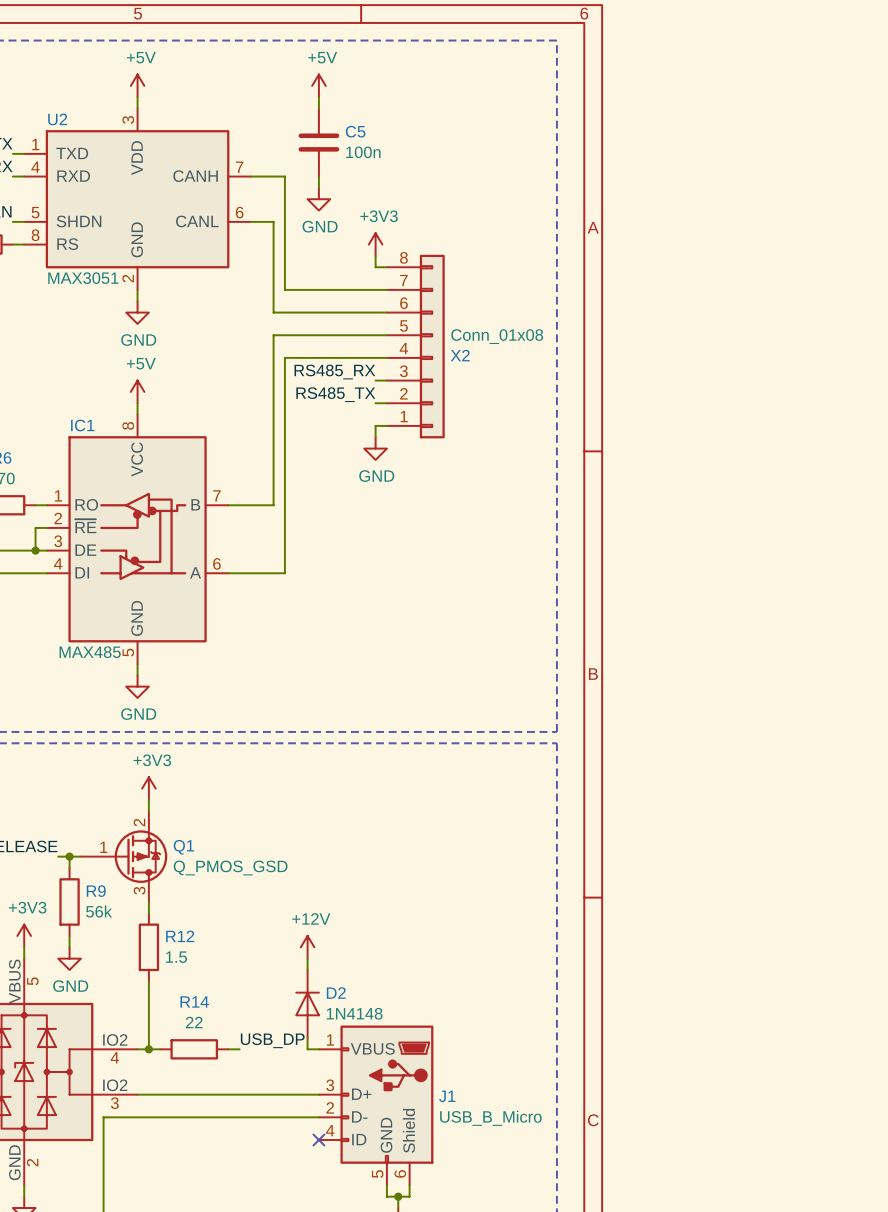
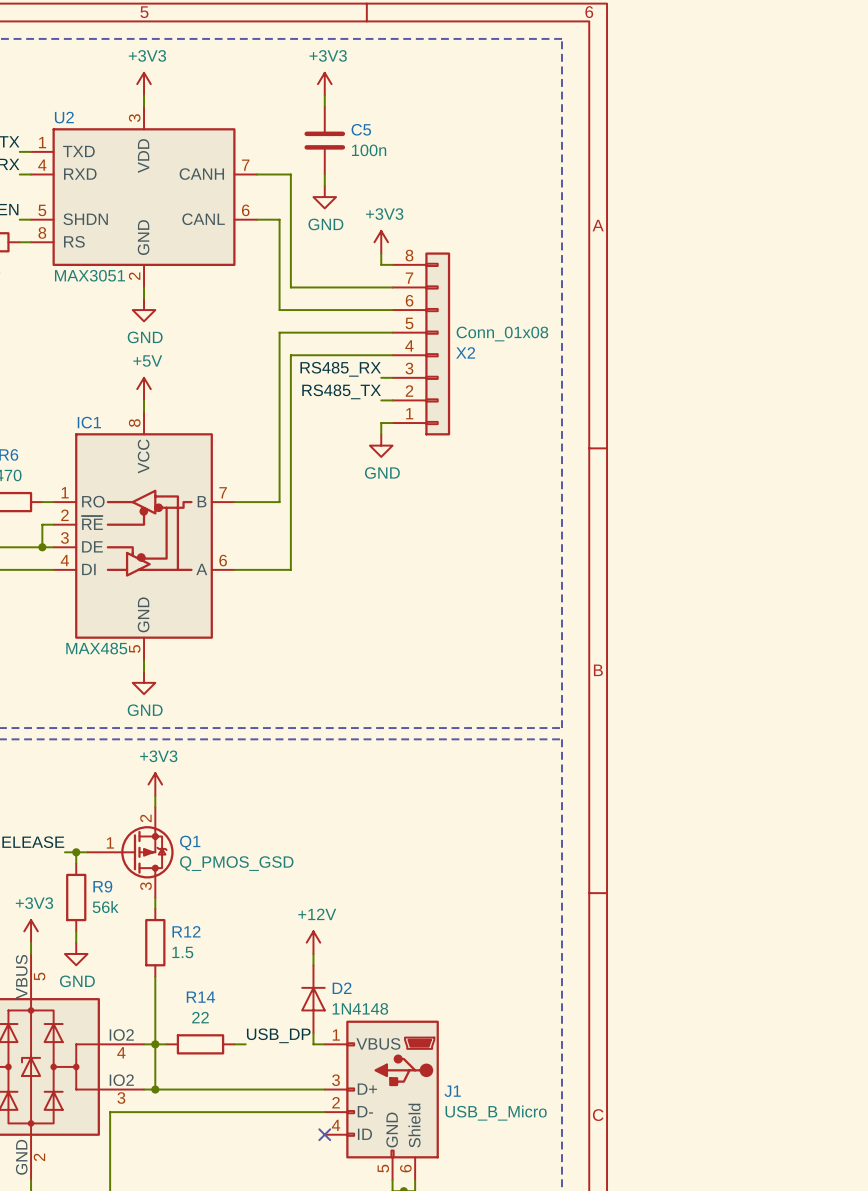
power symbol: +5V (137, 85) -> +3V3 (144, 84)
power symbol: +5V (318, 85) -> +3V3 (324, 84)
wire: none -> (155, 1044) (155, 1089)
junction: none -> (155, 1089)

